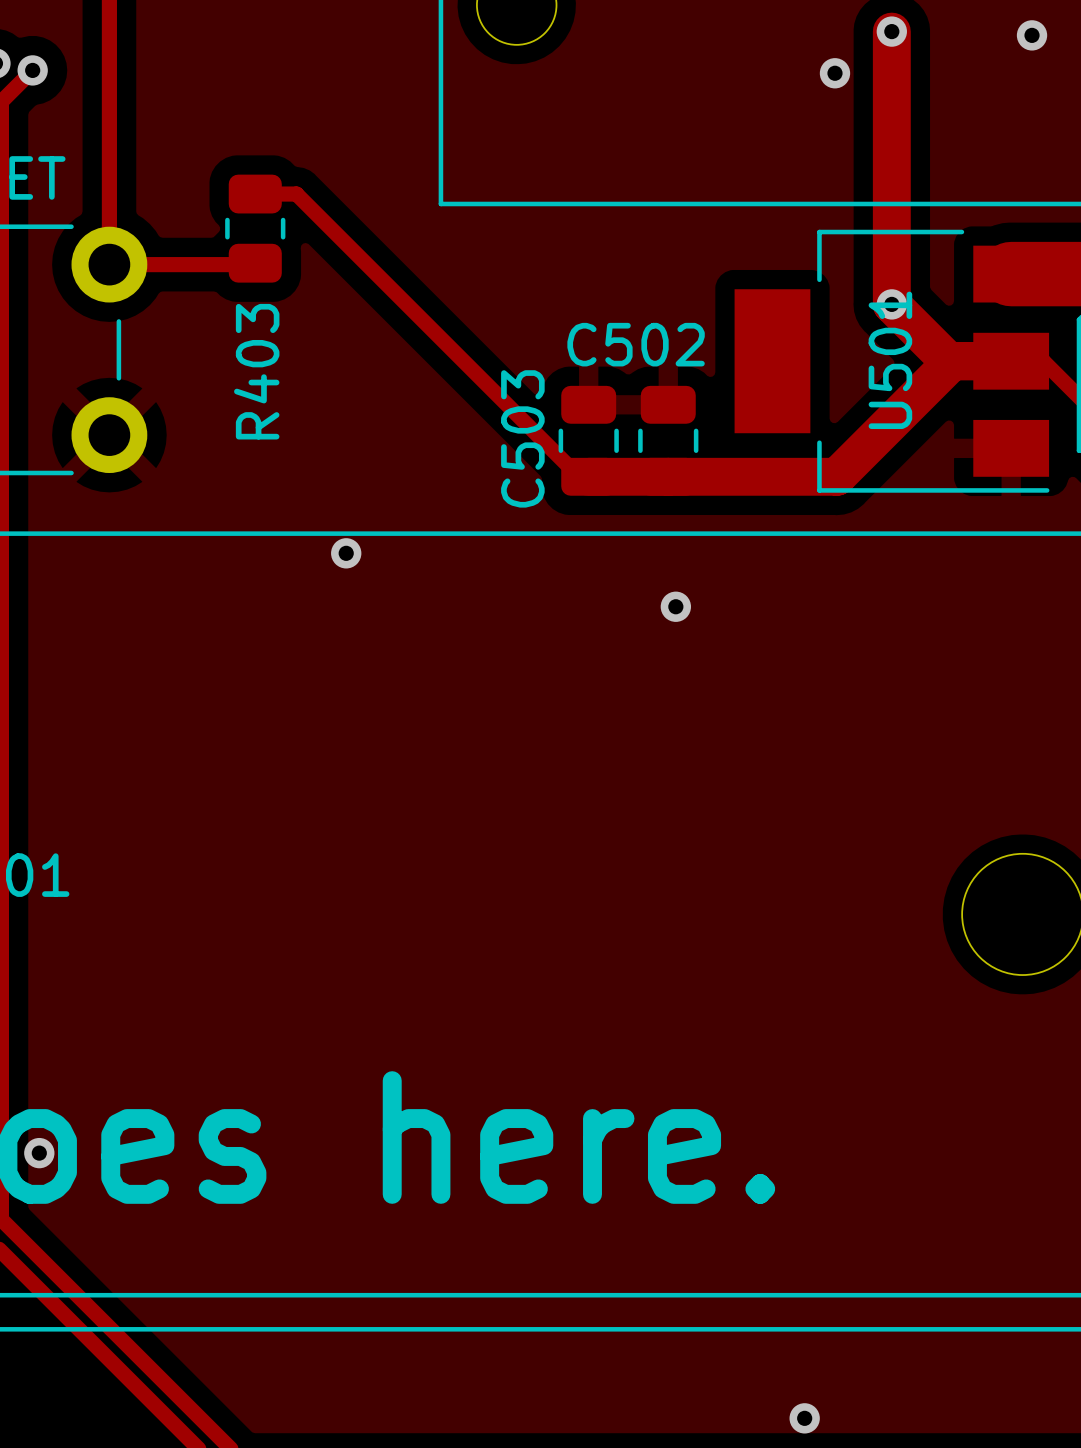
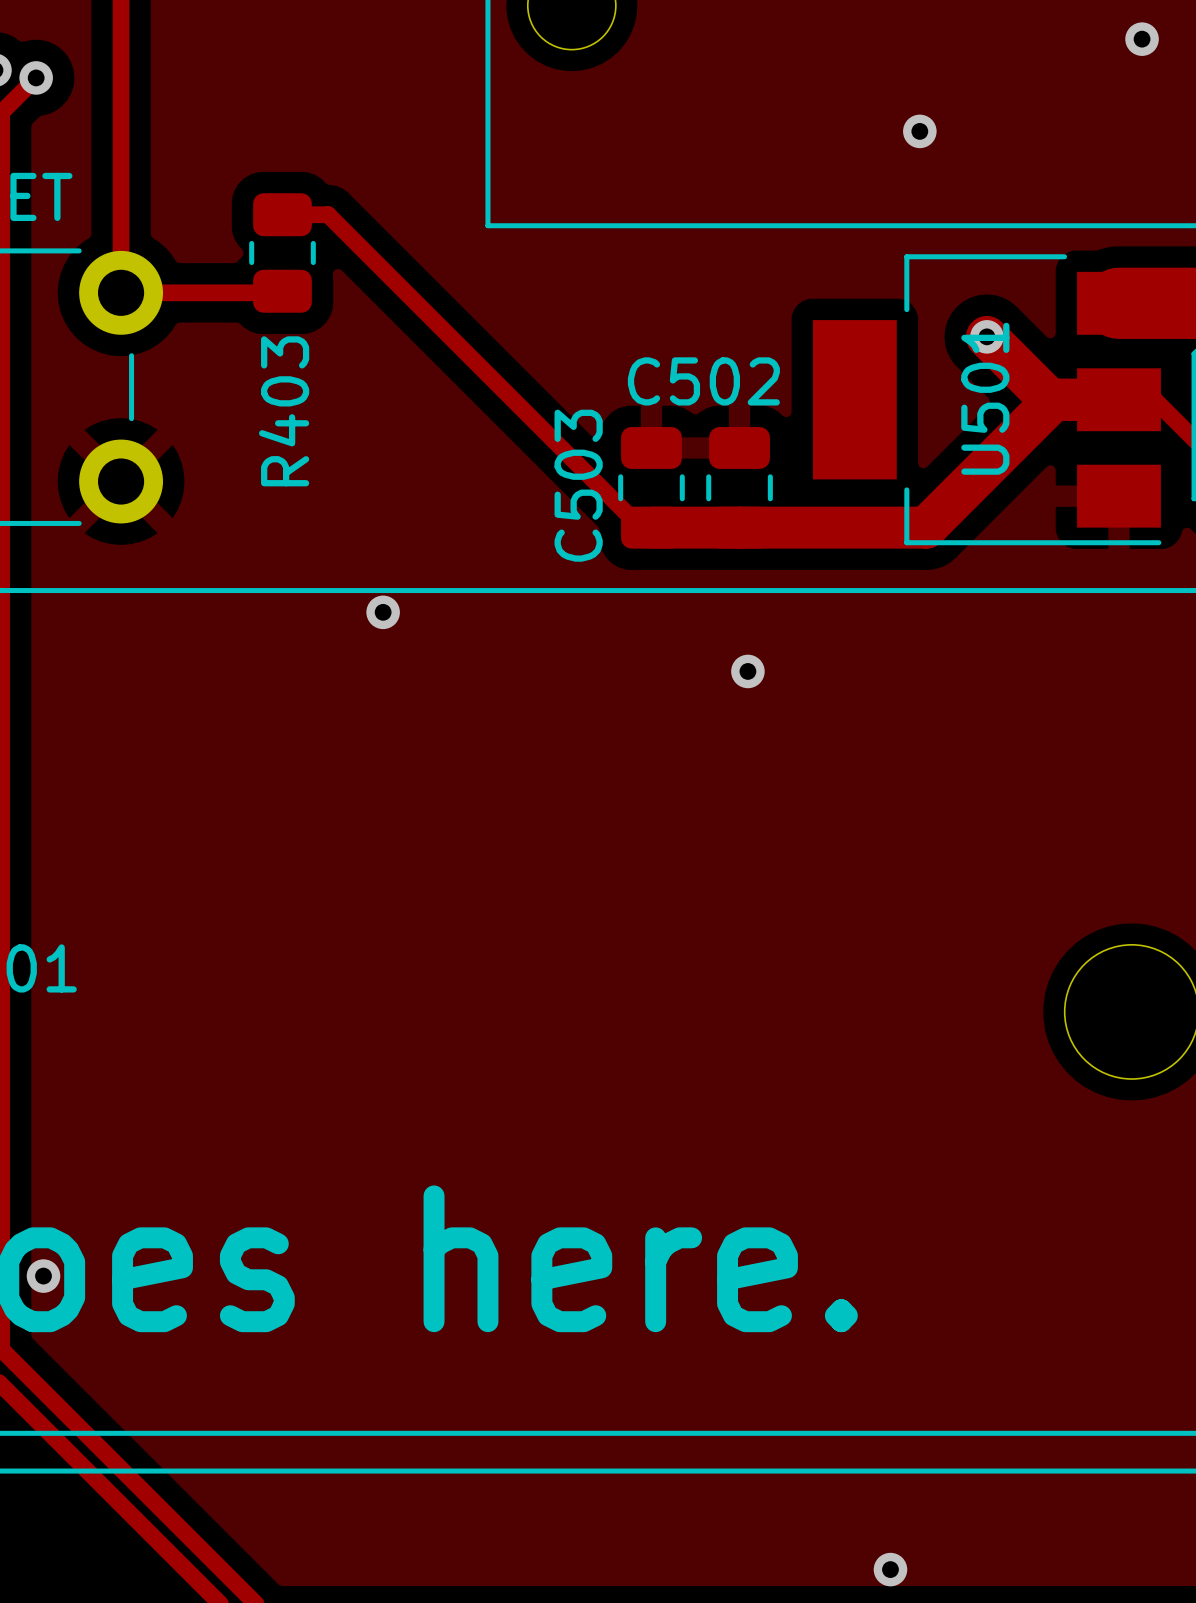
track: (891, 31) (891, 304) -> none
via: (891, 31) -> none
via position: (834, 73) -> (919, 131)

